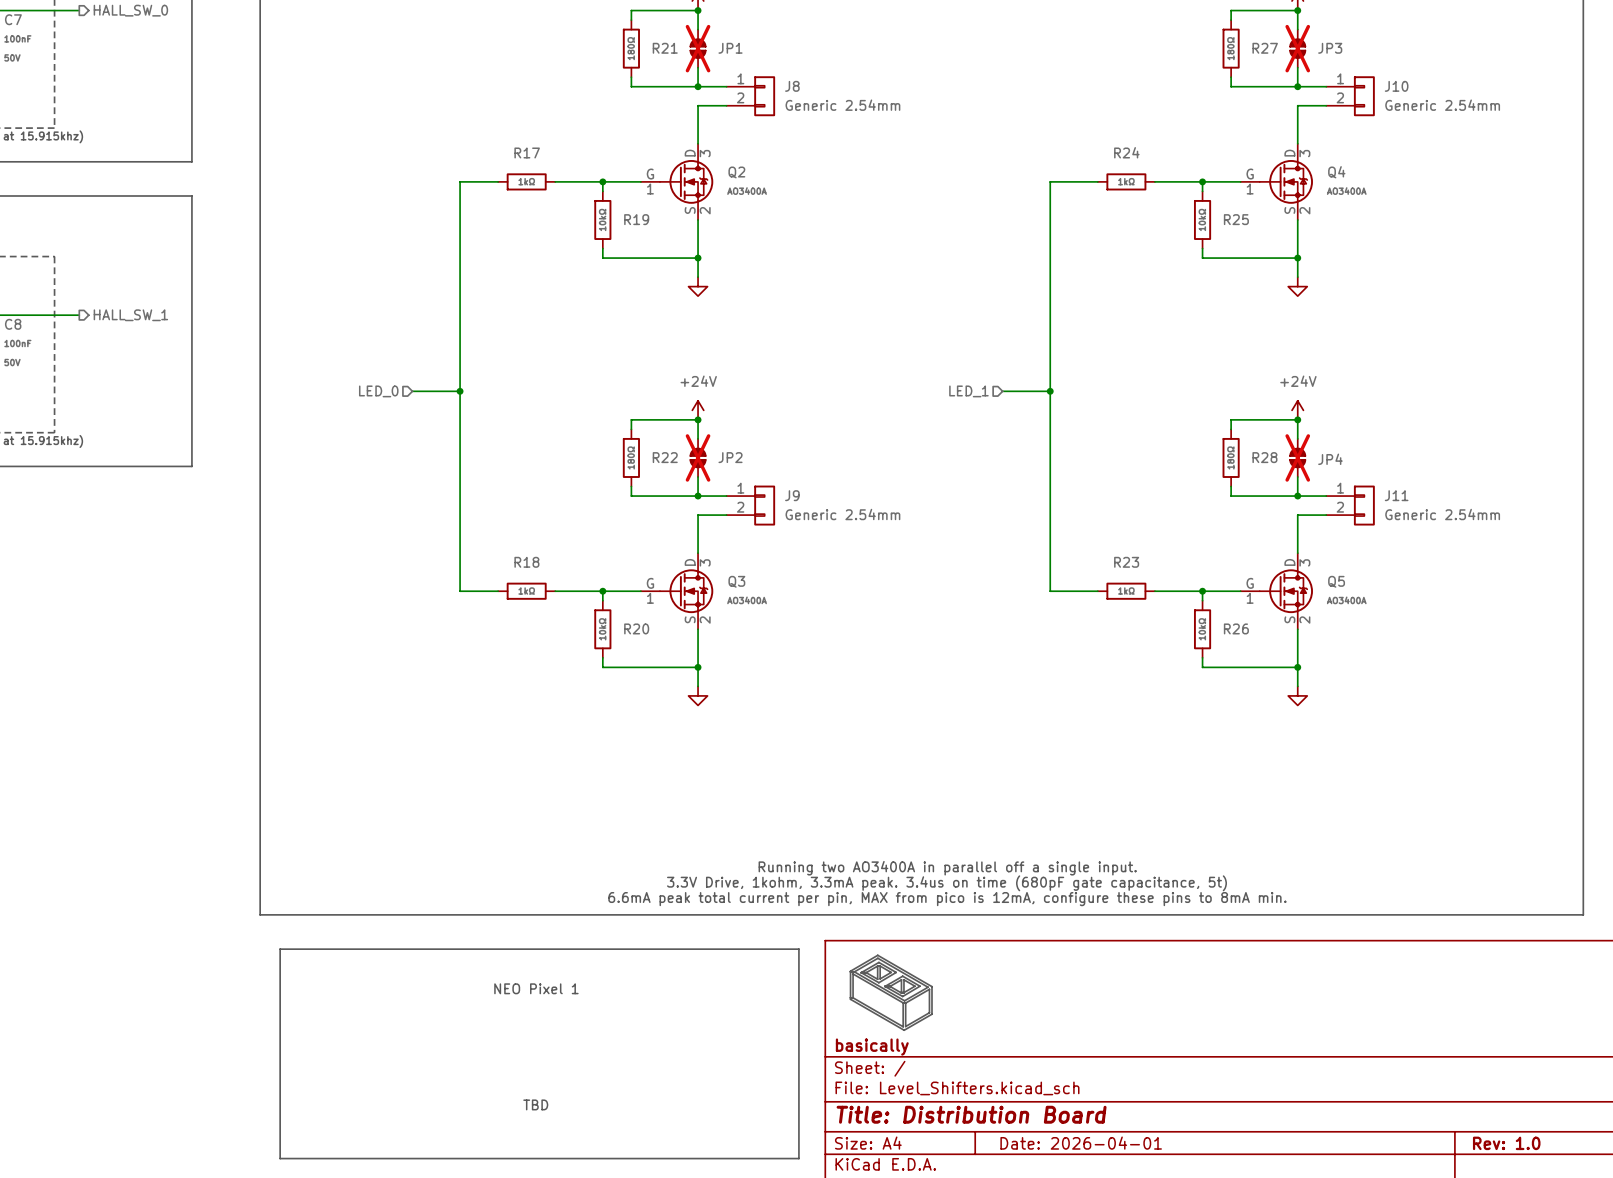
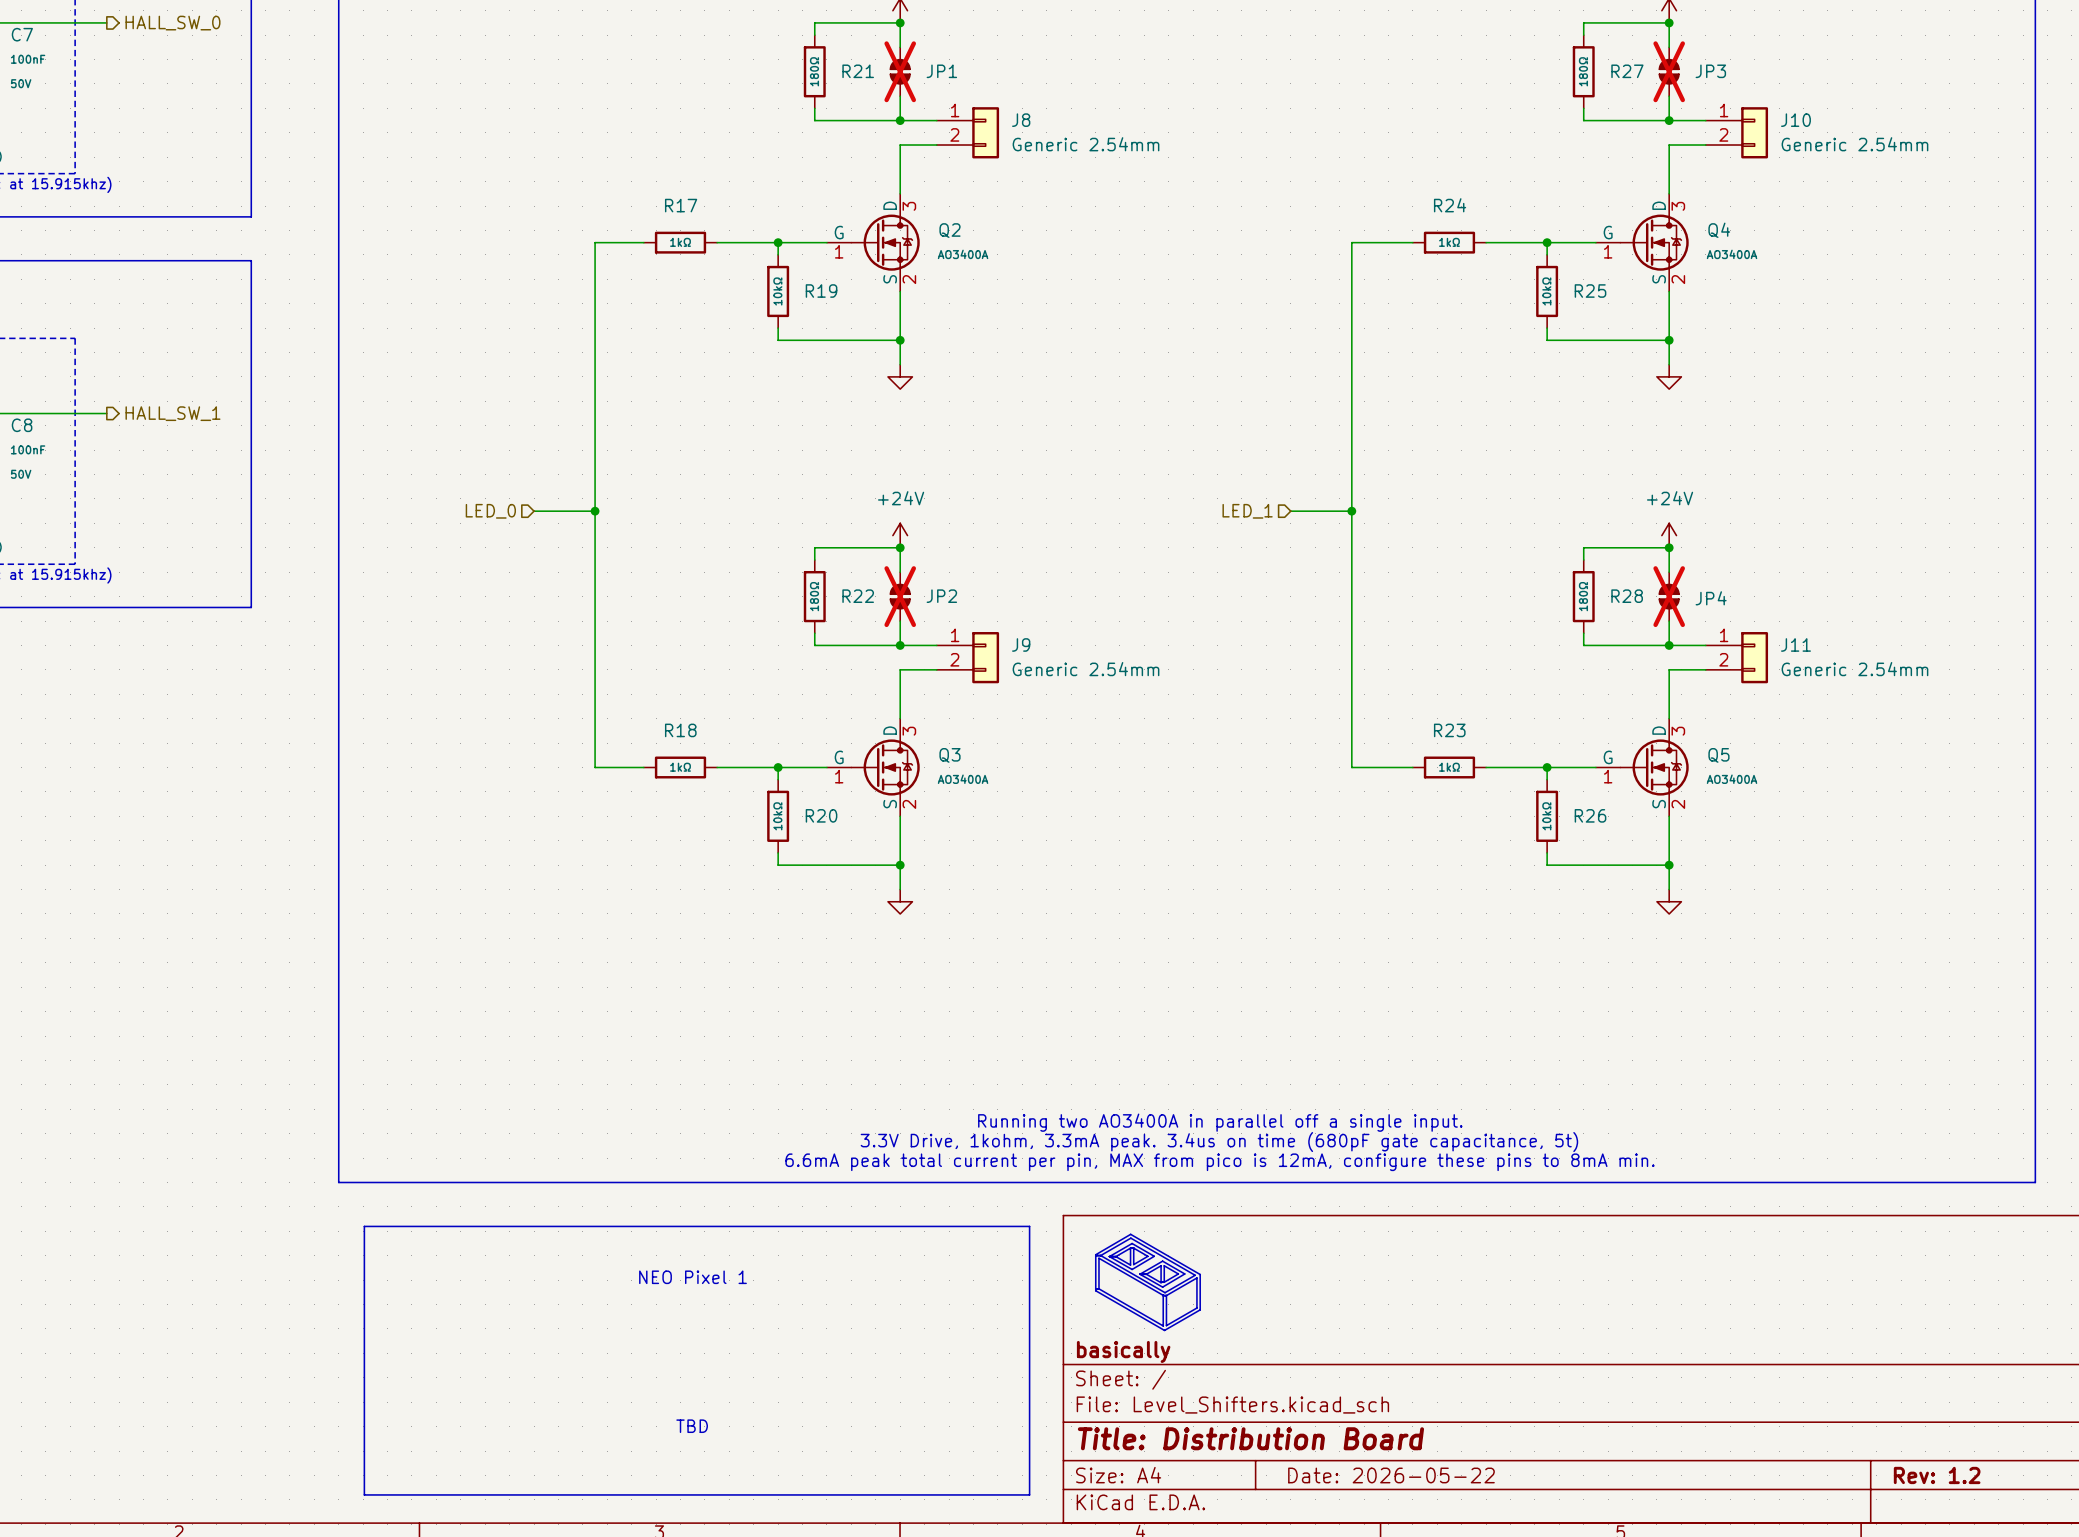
title block: Date: 2026-04-01 (1081, 1143) -> Date: 2026-05-22 (1391, 1475)
title block: Rev: 1.0 (1506, 1143) -> Rev: 1.2 (1937, 1475)

